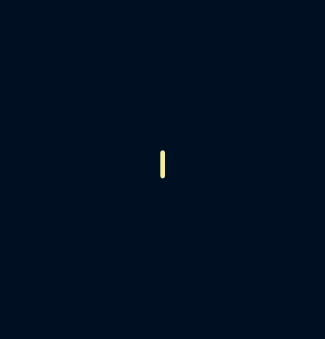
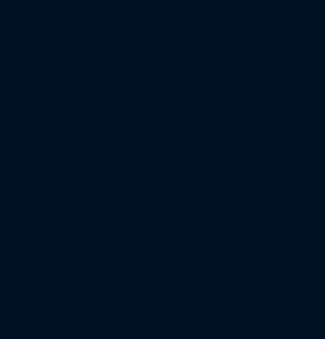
line: (162, 152) (162, 176) -> none

